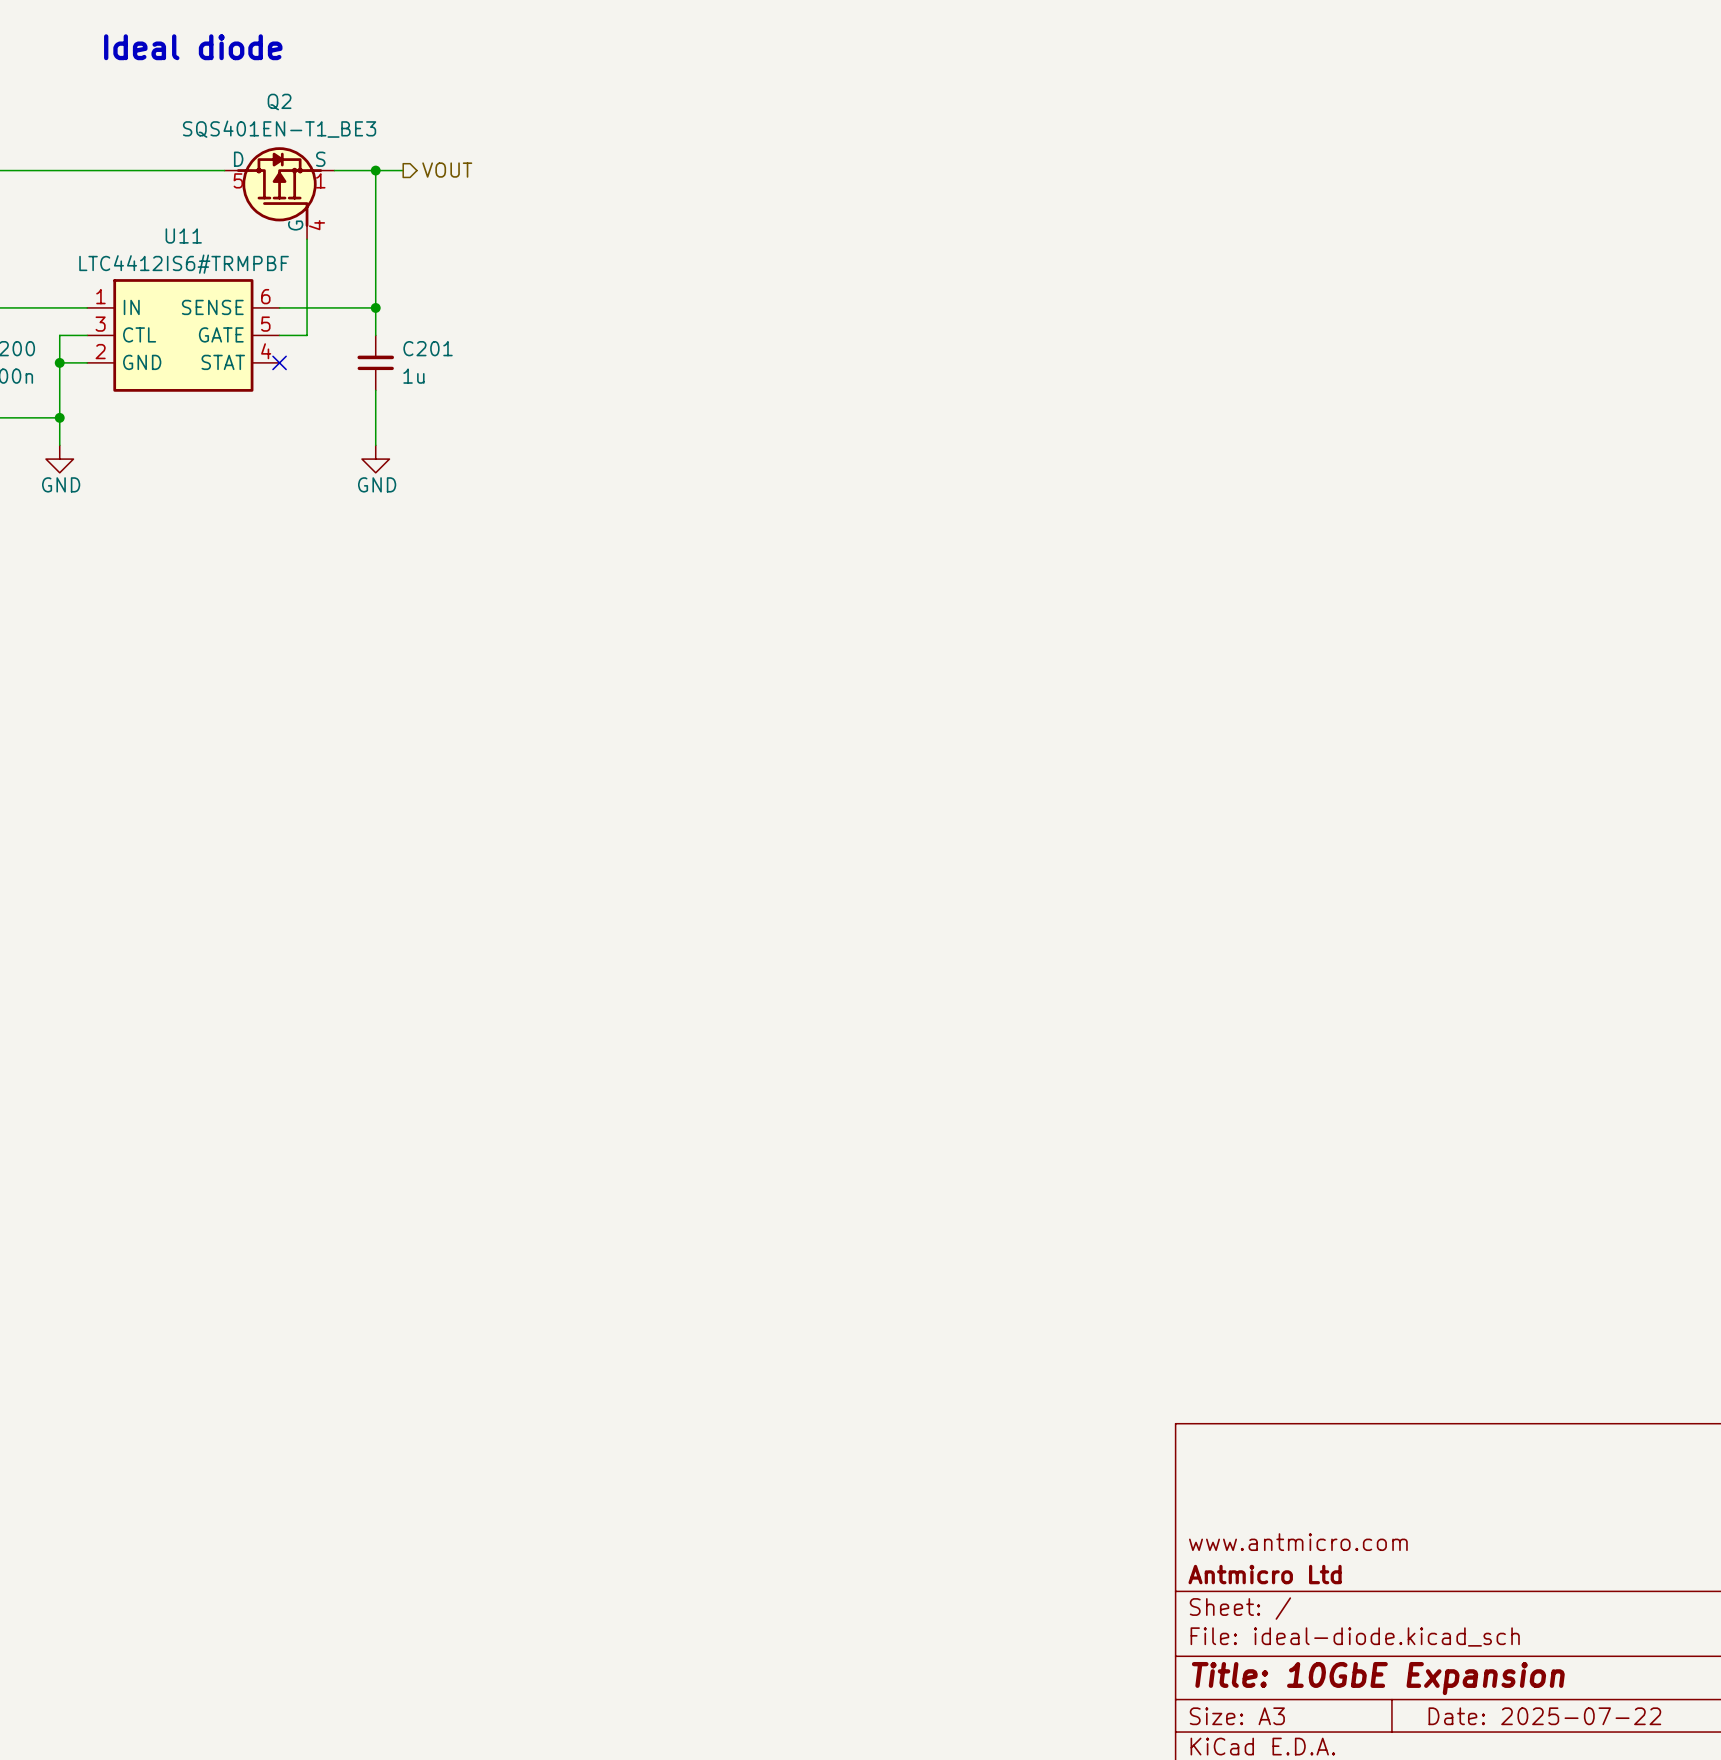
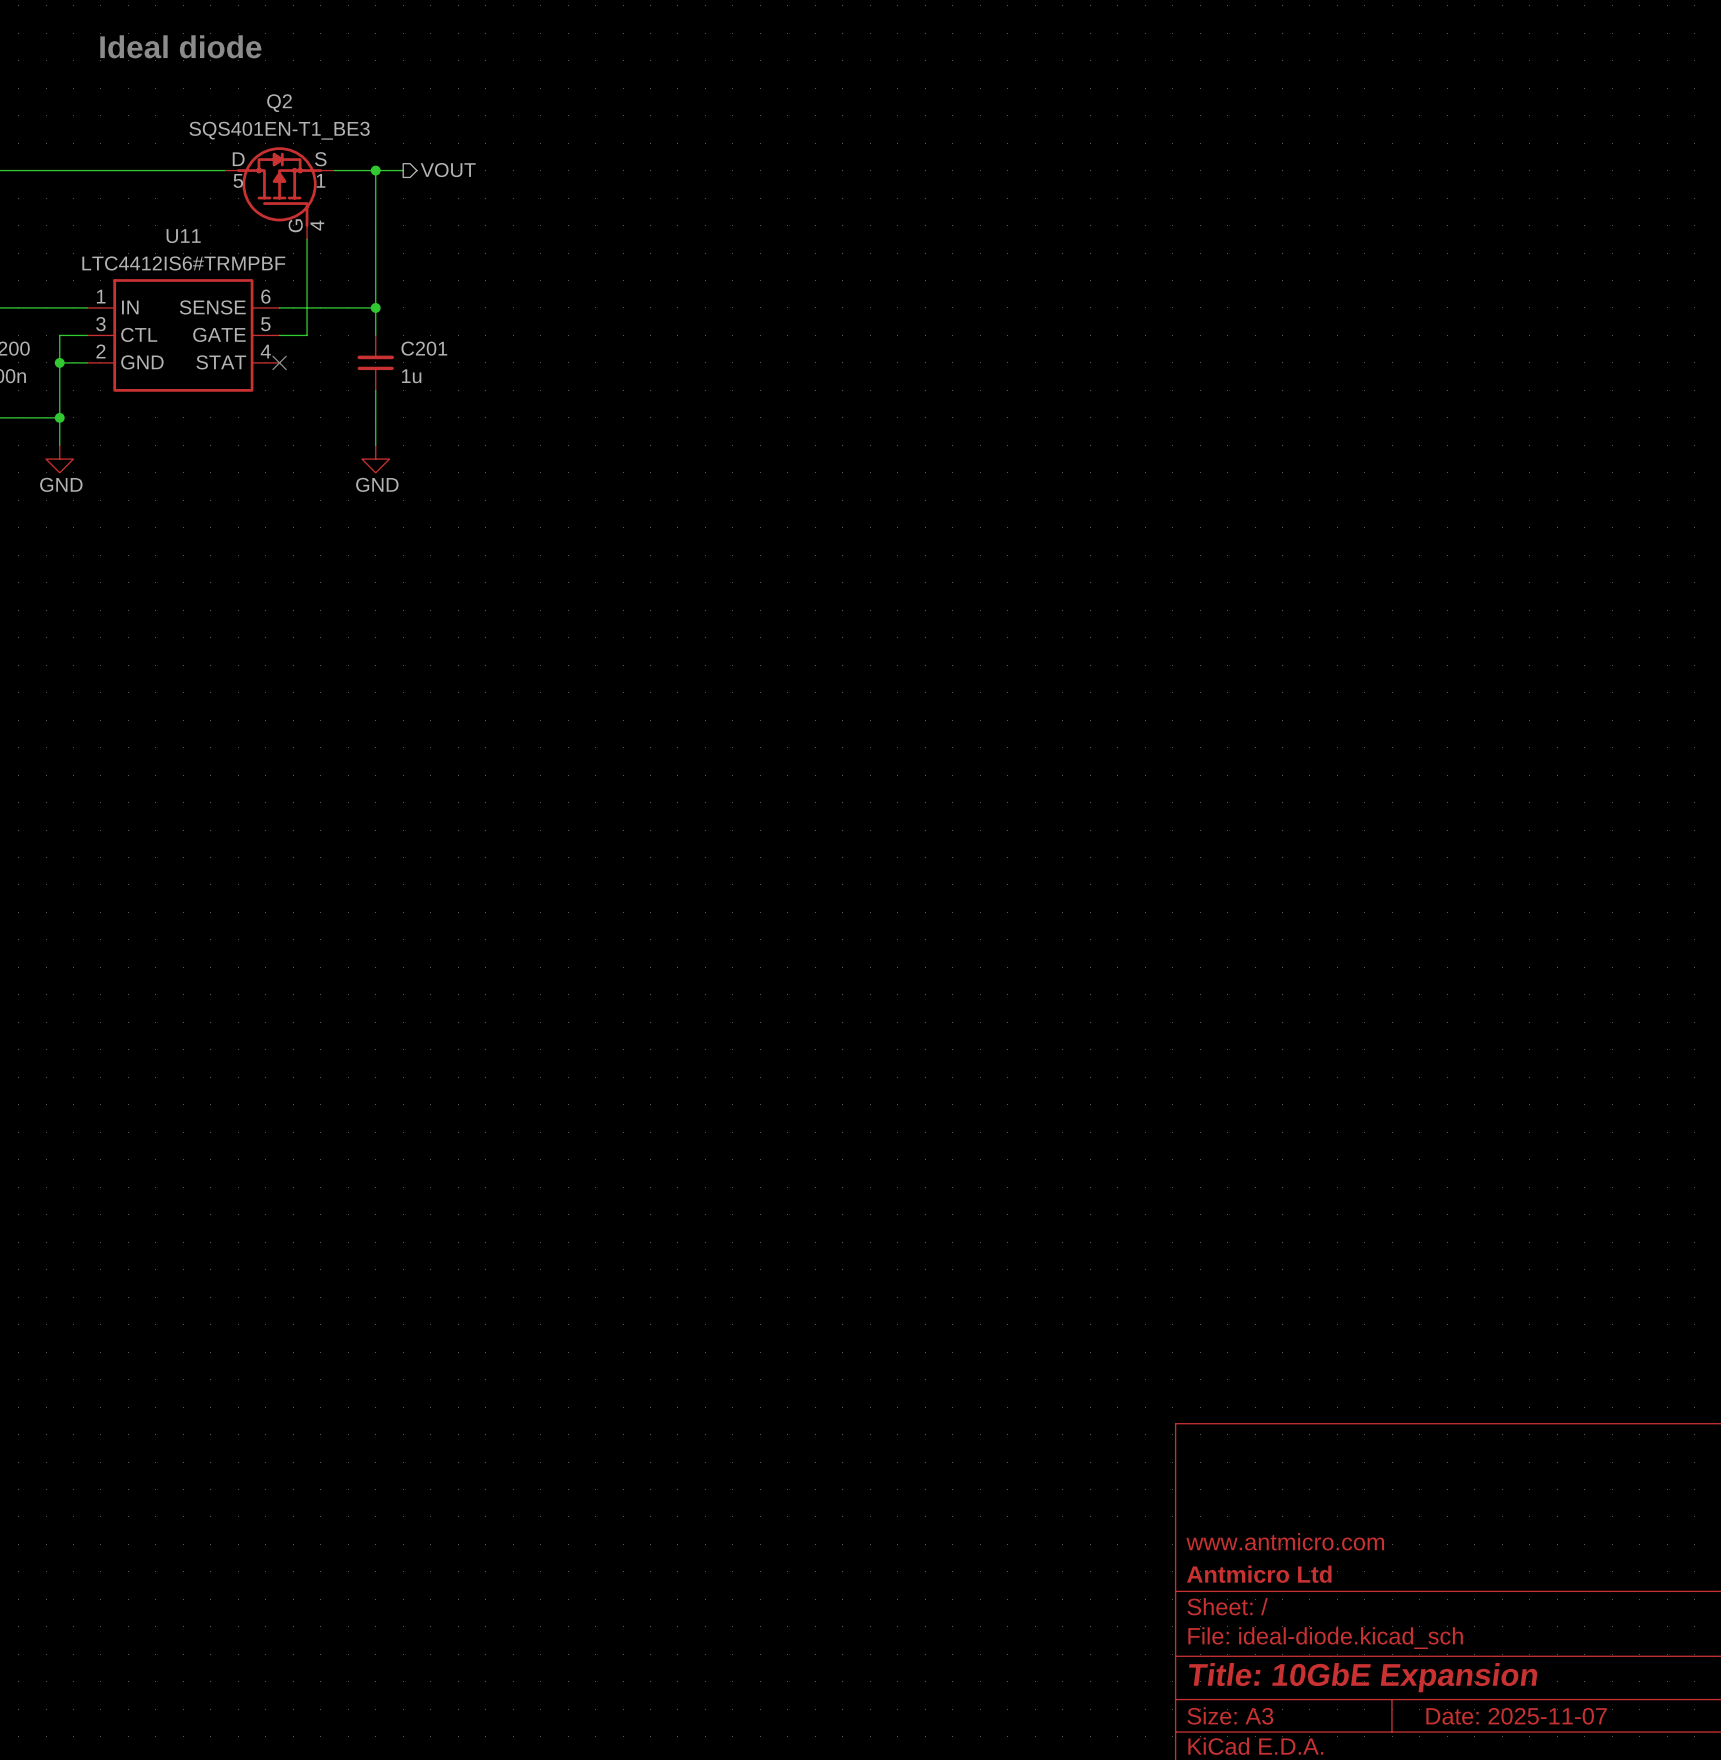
title block: Date: 2025-07-22 (1544, 1716) -> Date: 2025-11-07 (1516, 1716)

